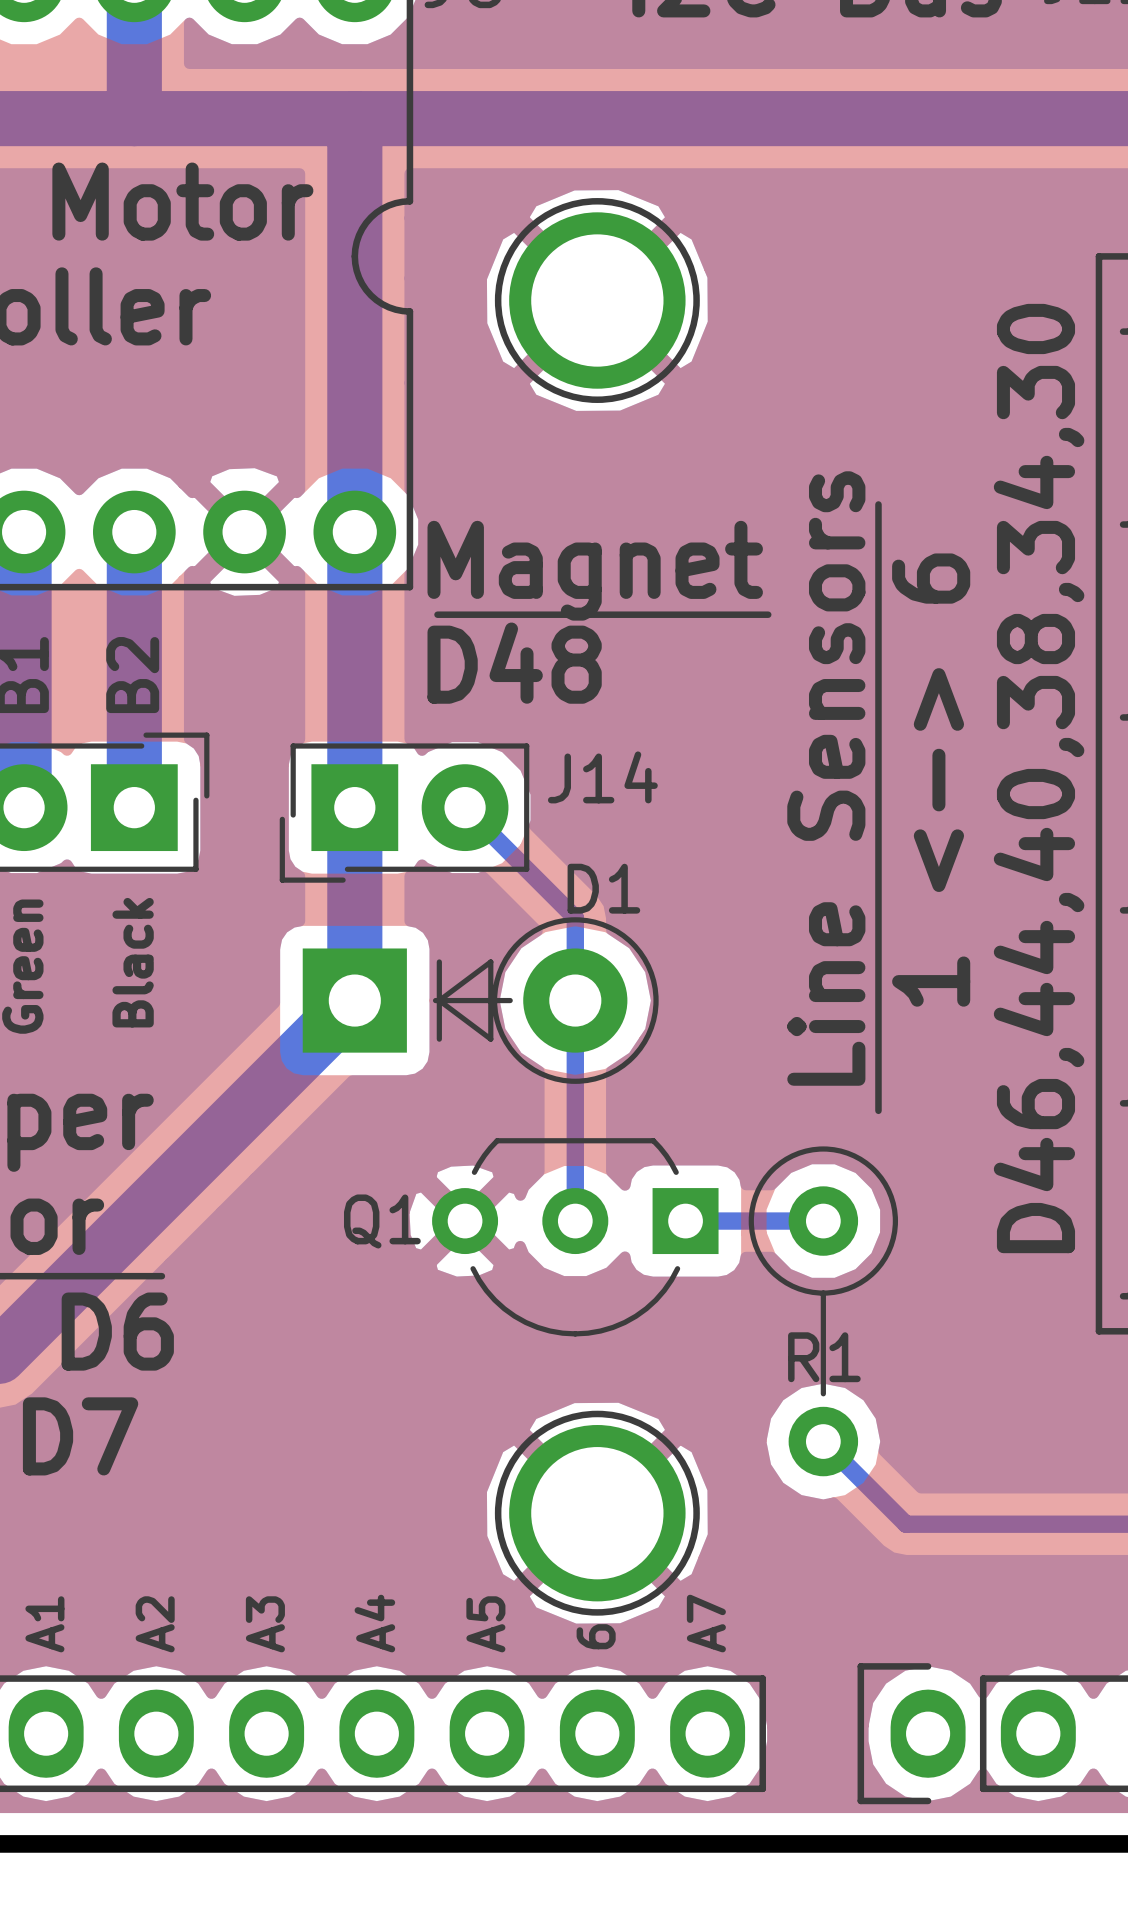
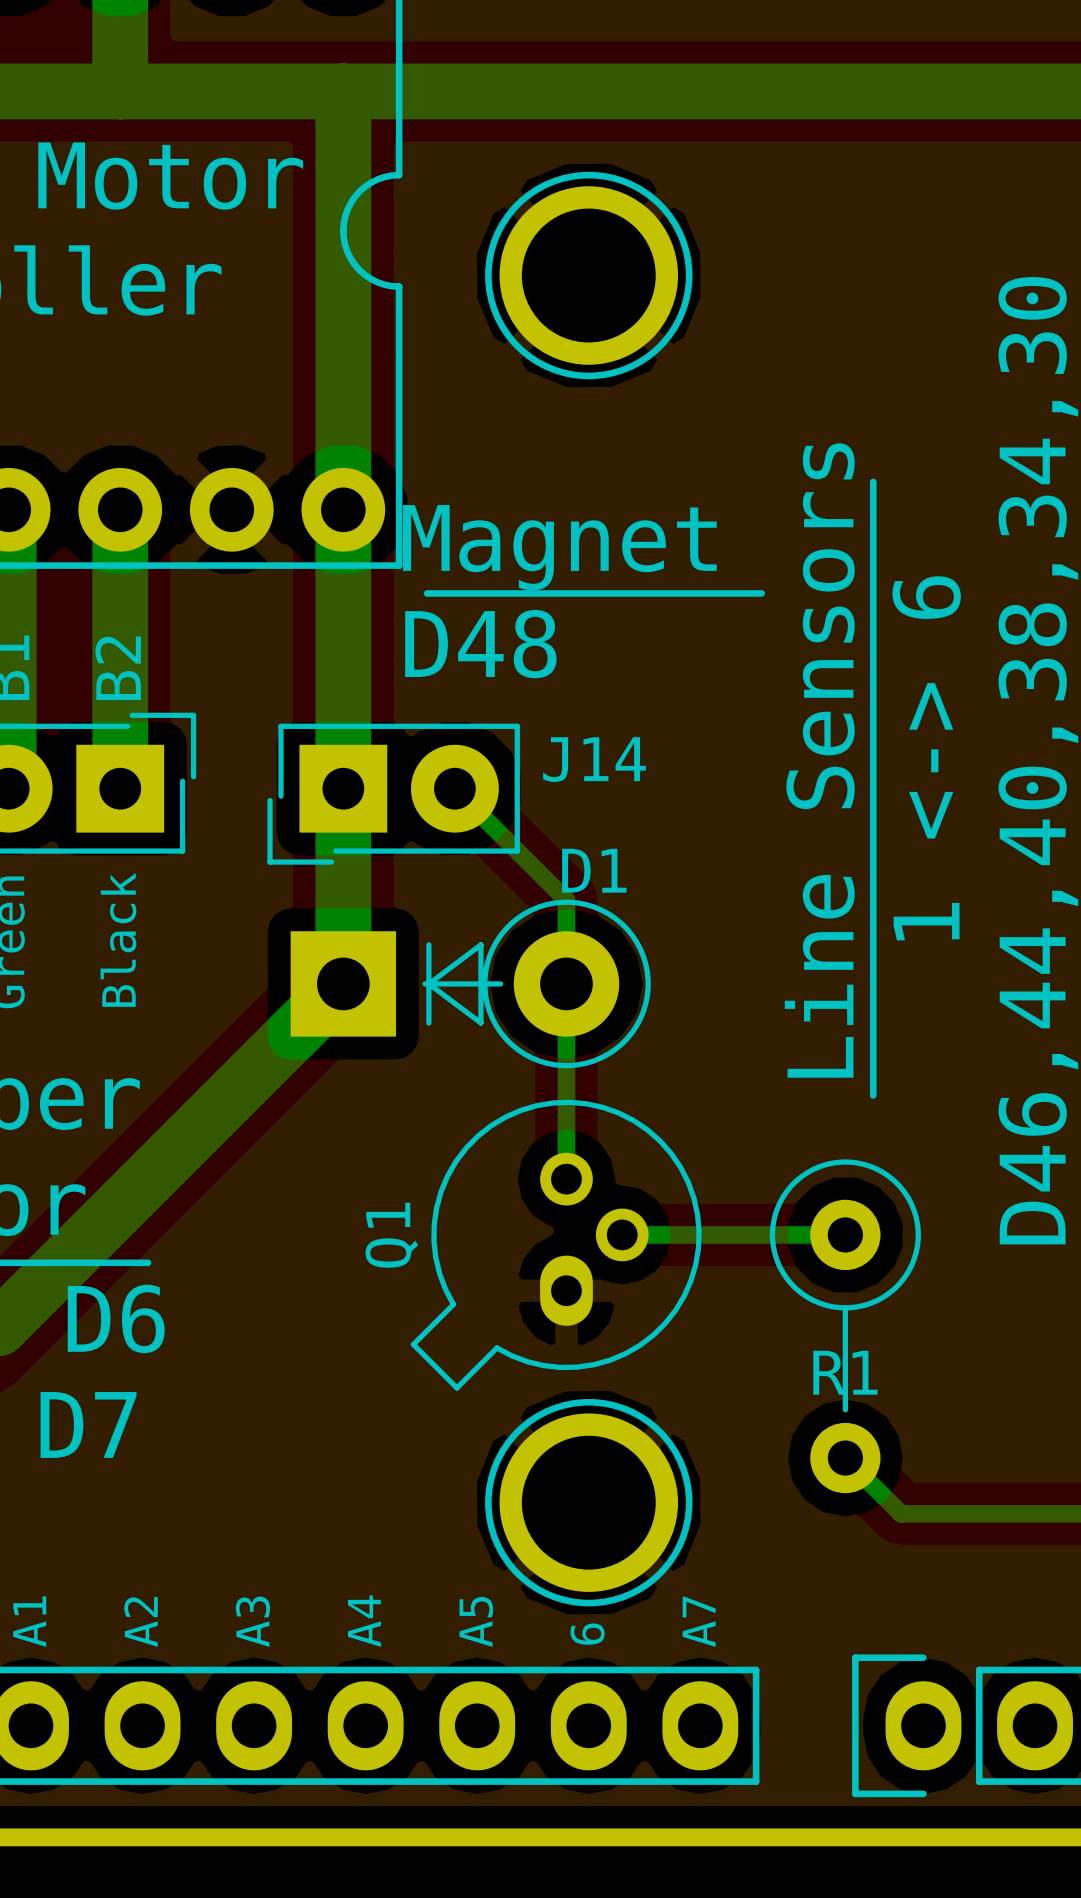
Q1 footprint: [432, 1138, 719, 1337] -> [410, 1099, 702, 1391]
bottom track: (685, 1221) (823, 1221) -> none
bottom track: none -> (622, 1234) (845, 1234)
R1 position: (823, 1311) -> (845, 1326)

